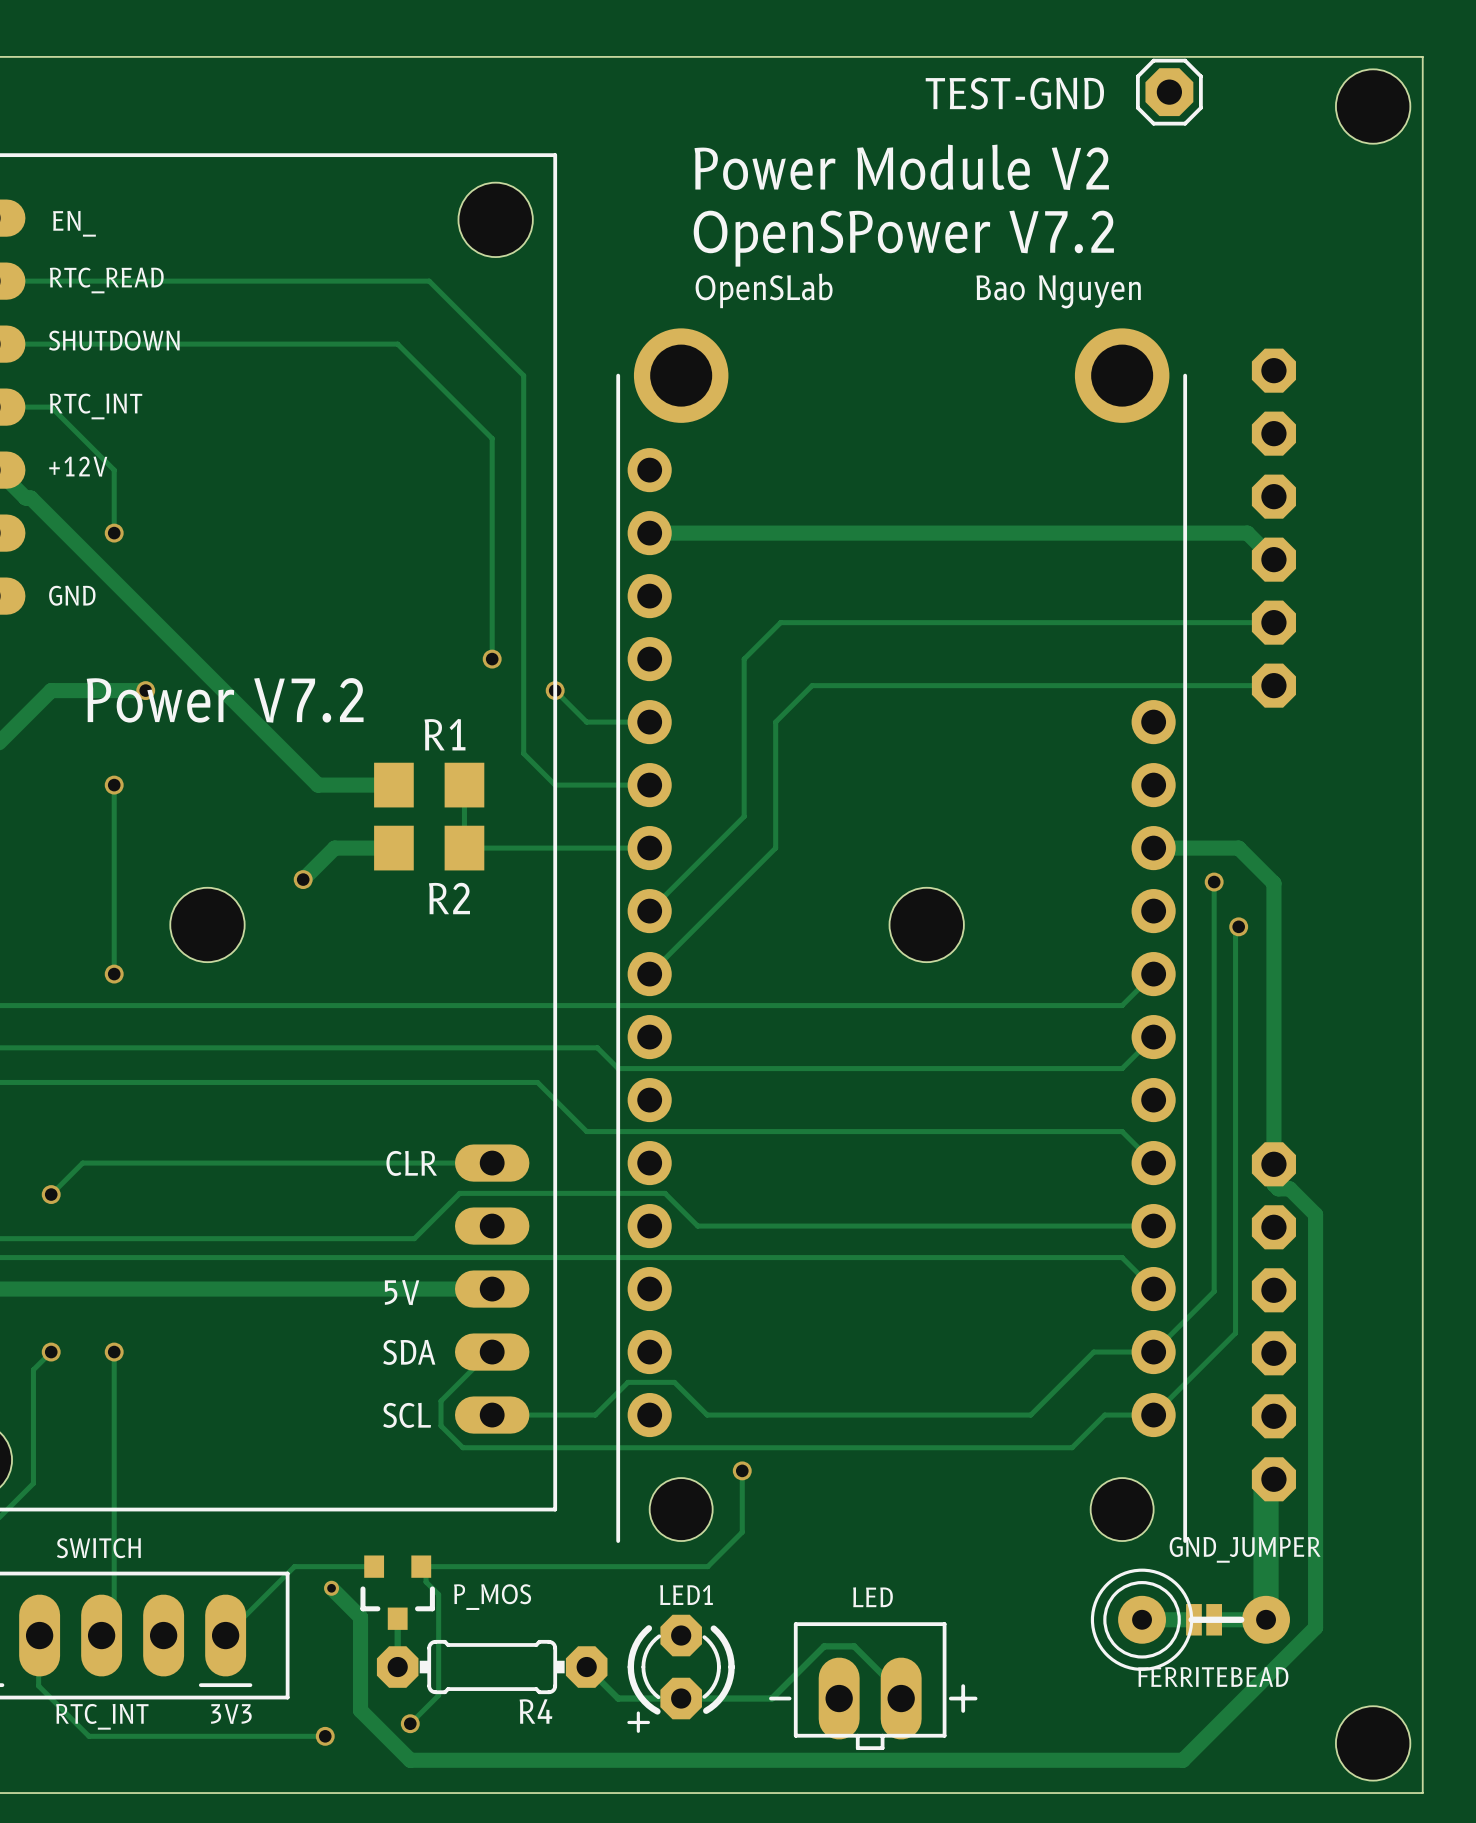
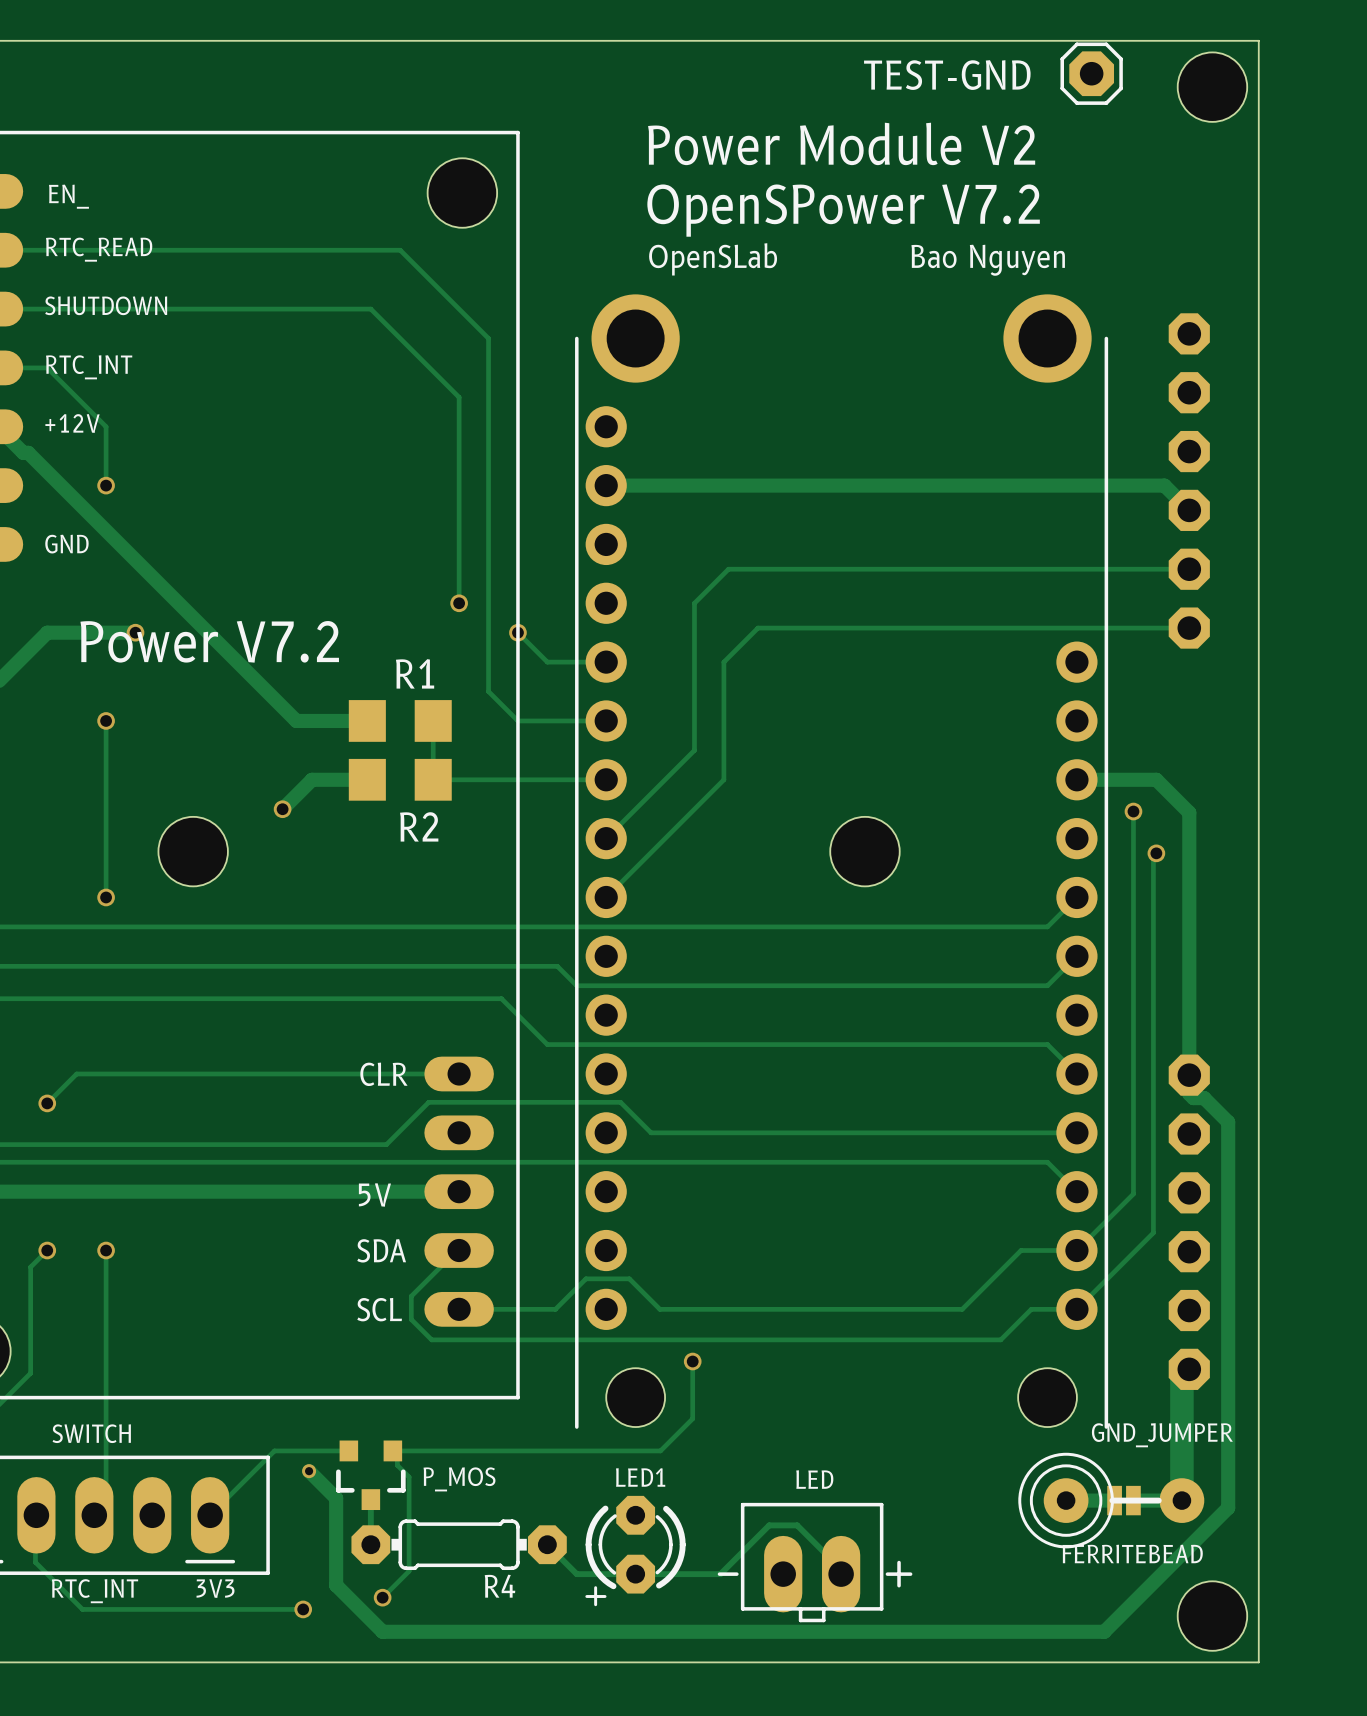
board edge: (1348, 56) (1422, 56) (1422, 1793) (1348, 1793) -> (1258, 40) (1258, 1662)
hole position: (1373, 106) -> (1212, 87)
hole position: (1373, 1743) -> (1212, 1616)

